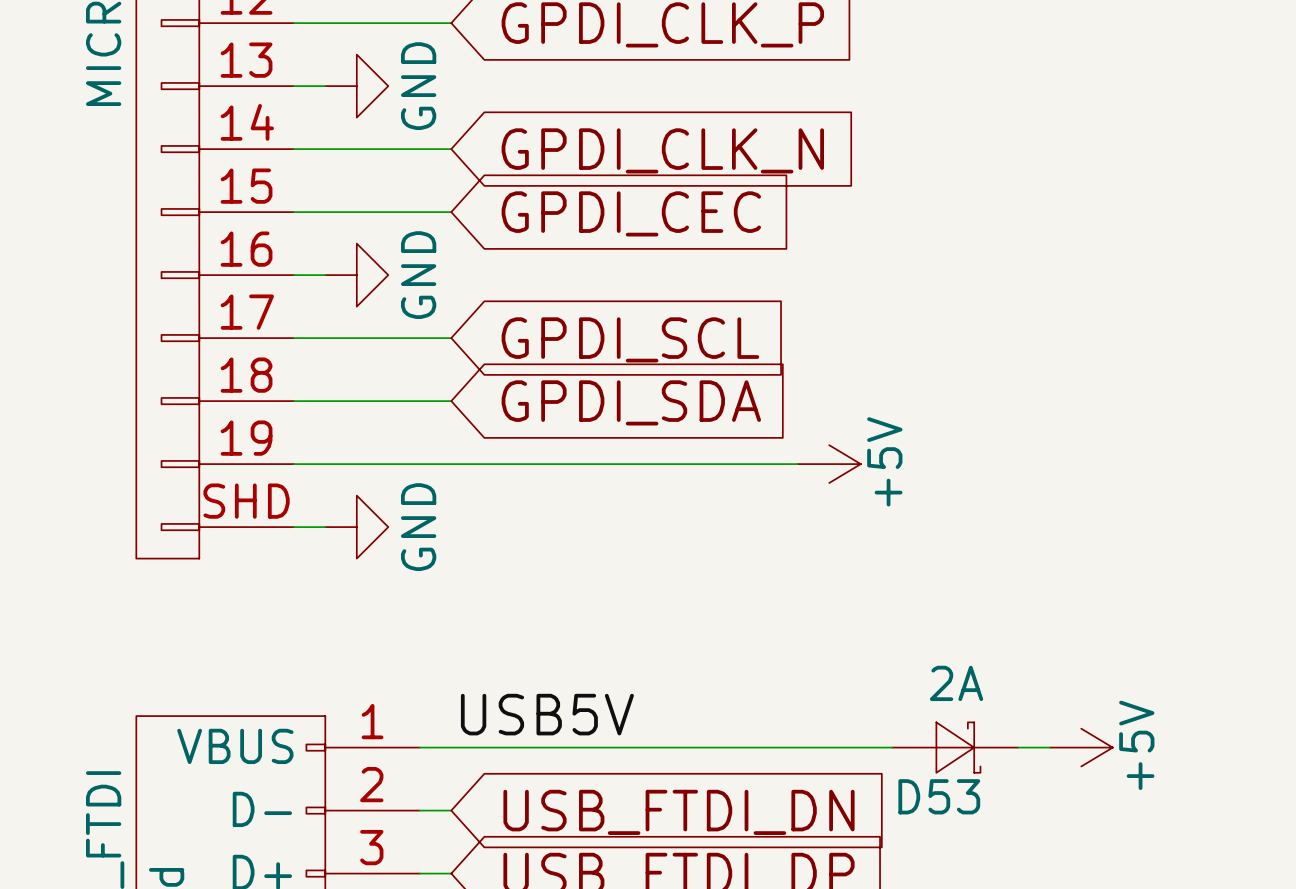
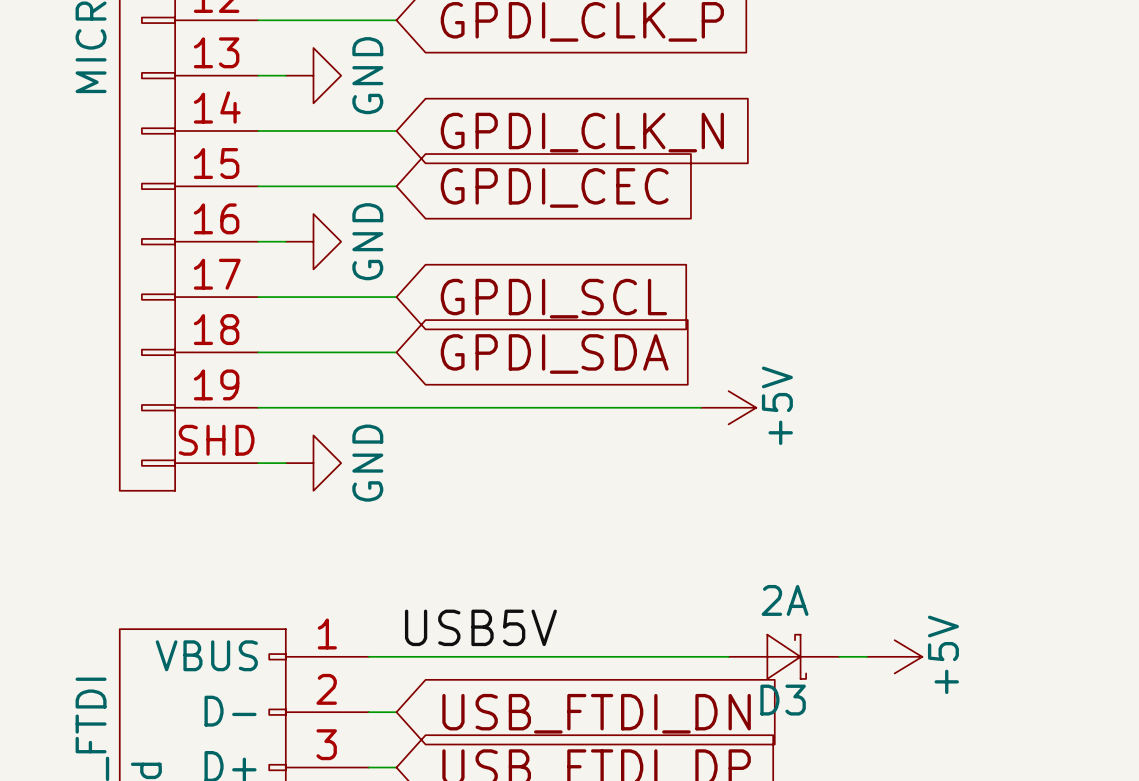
D3: none -> 2A (783, 656)
D53: 2A (955, 747) -> none
power symbol position: +5V (1081, 747) -> +5V (894, 656)

